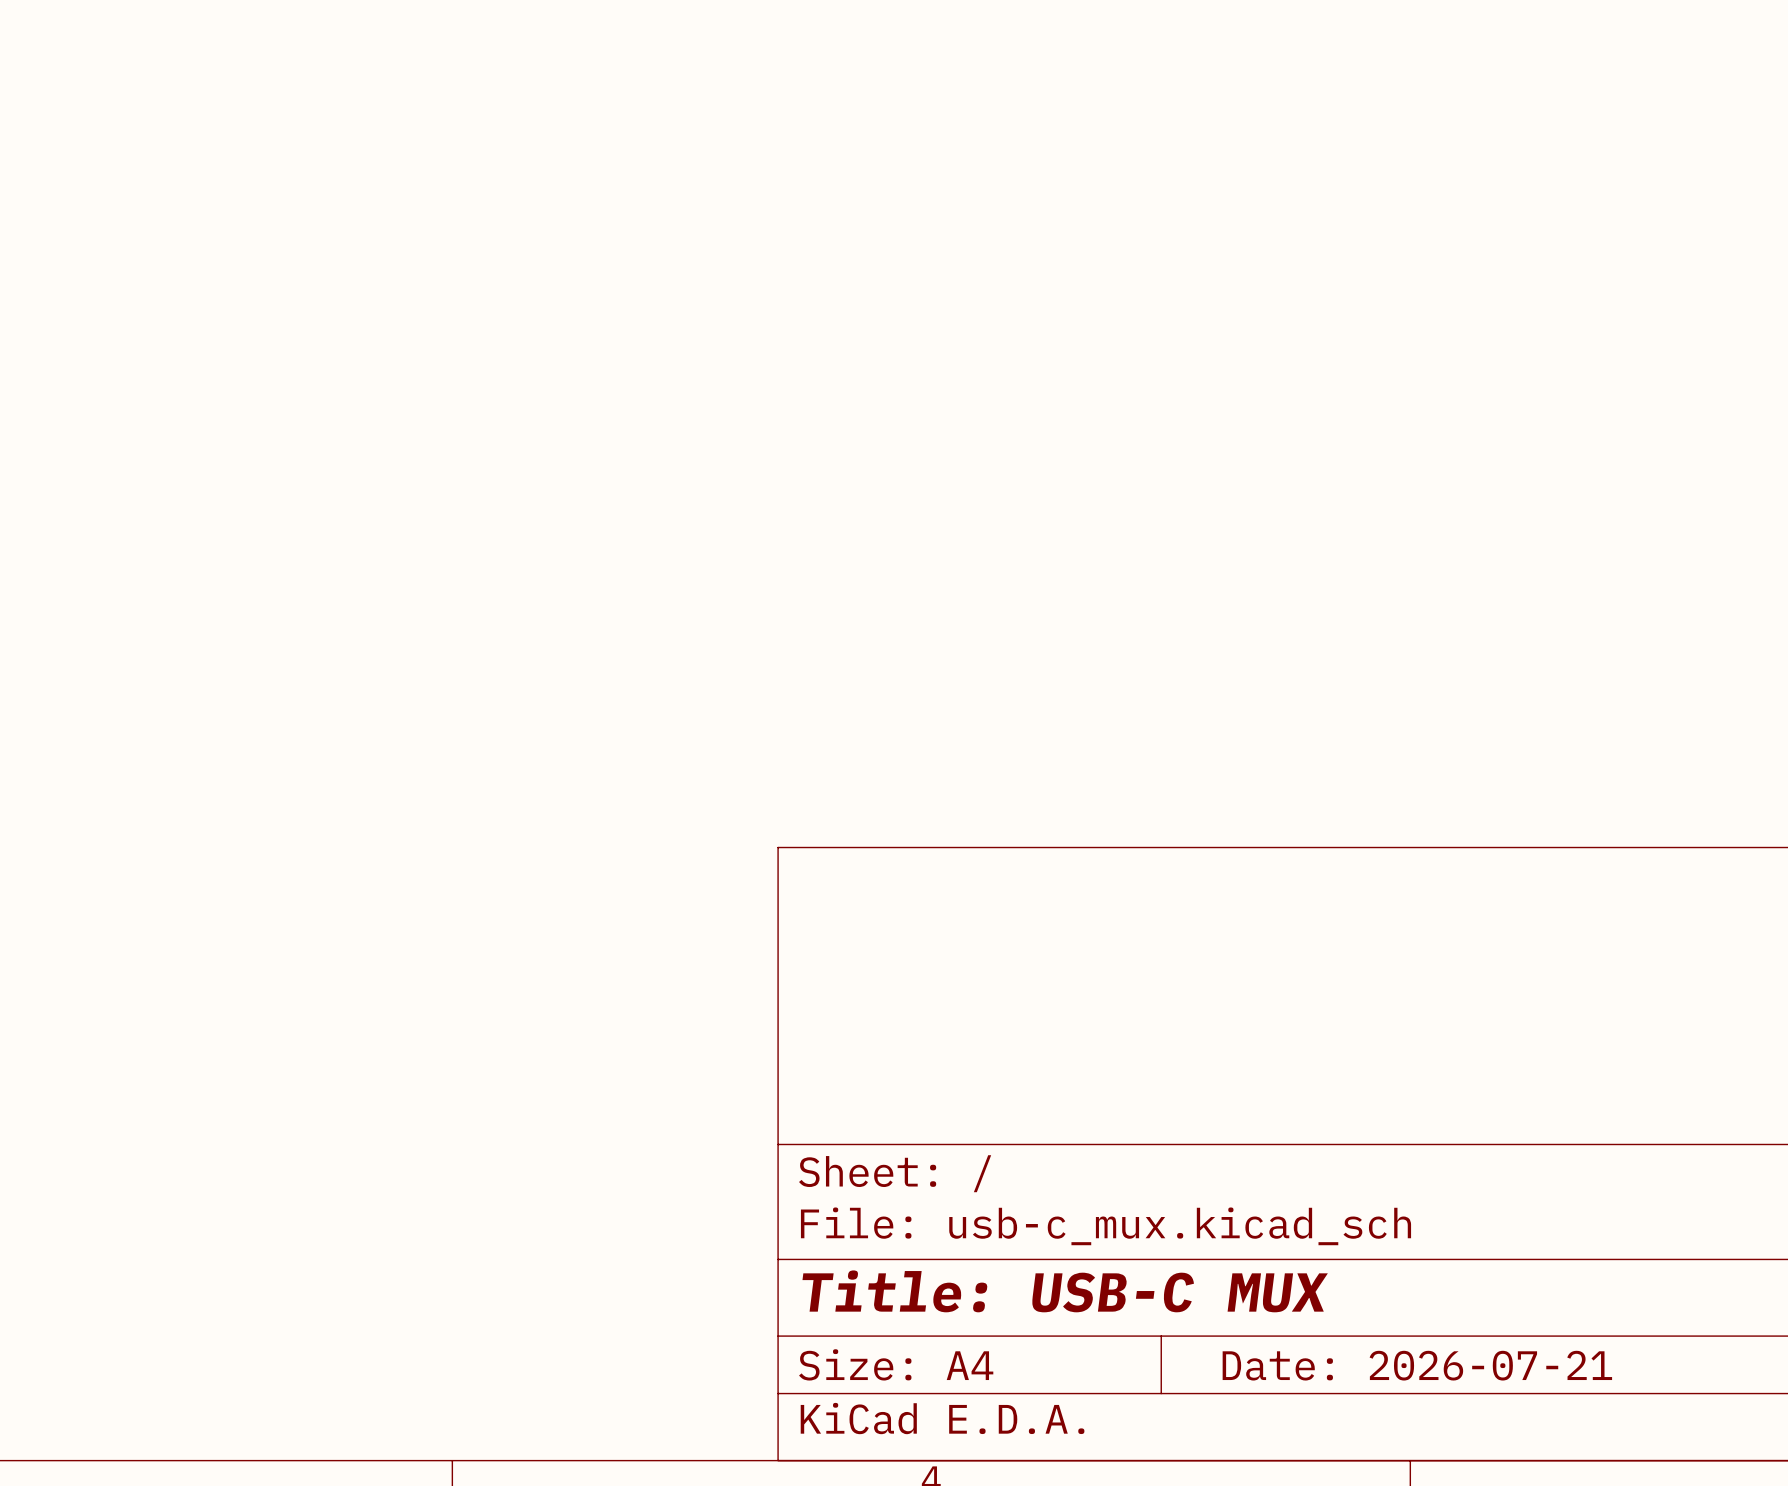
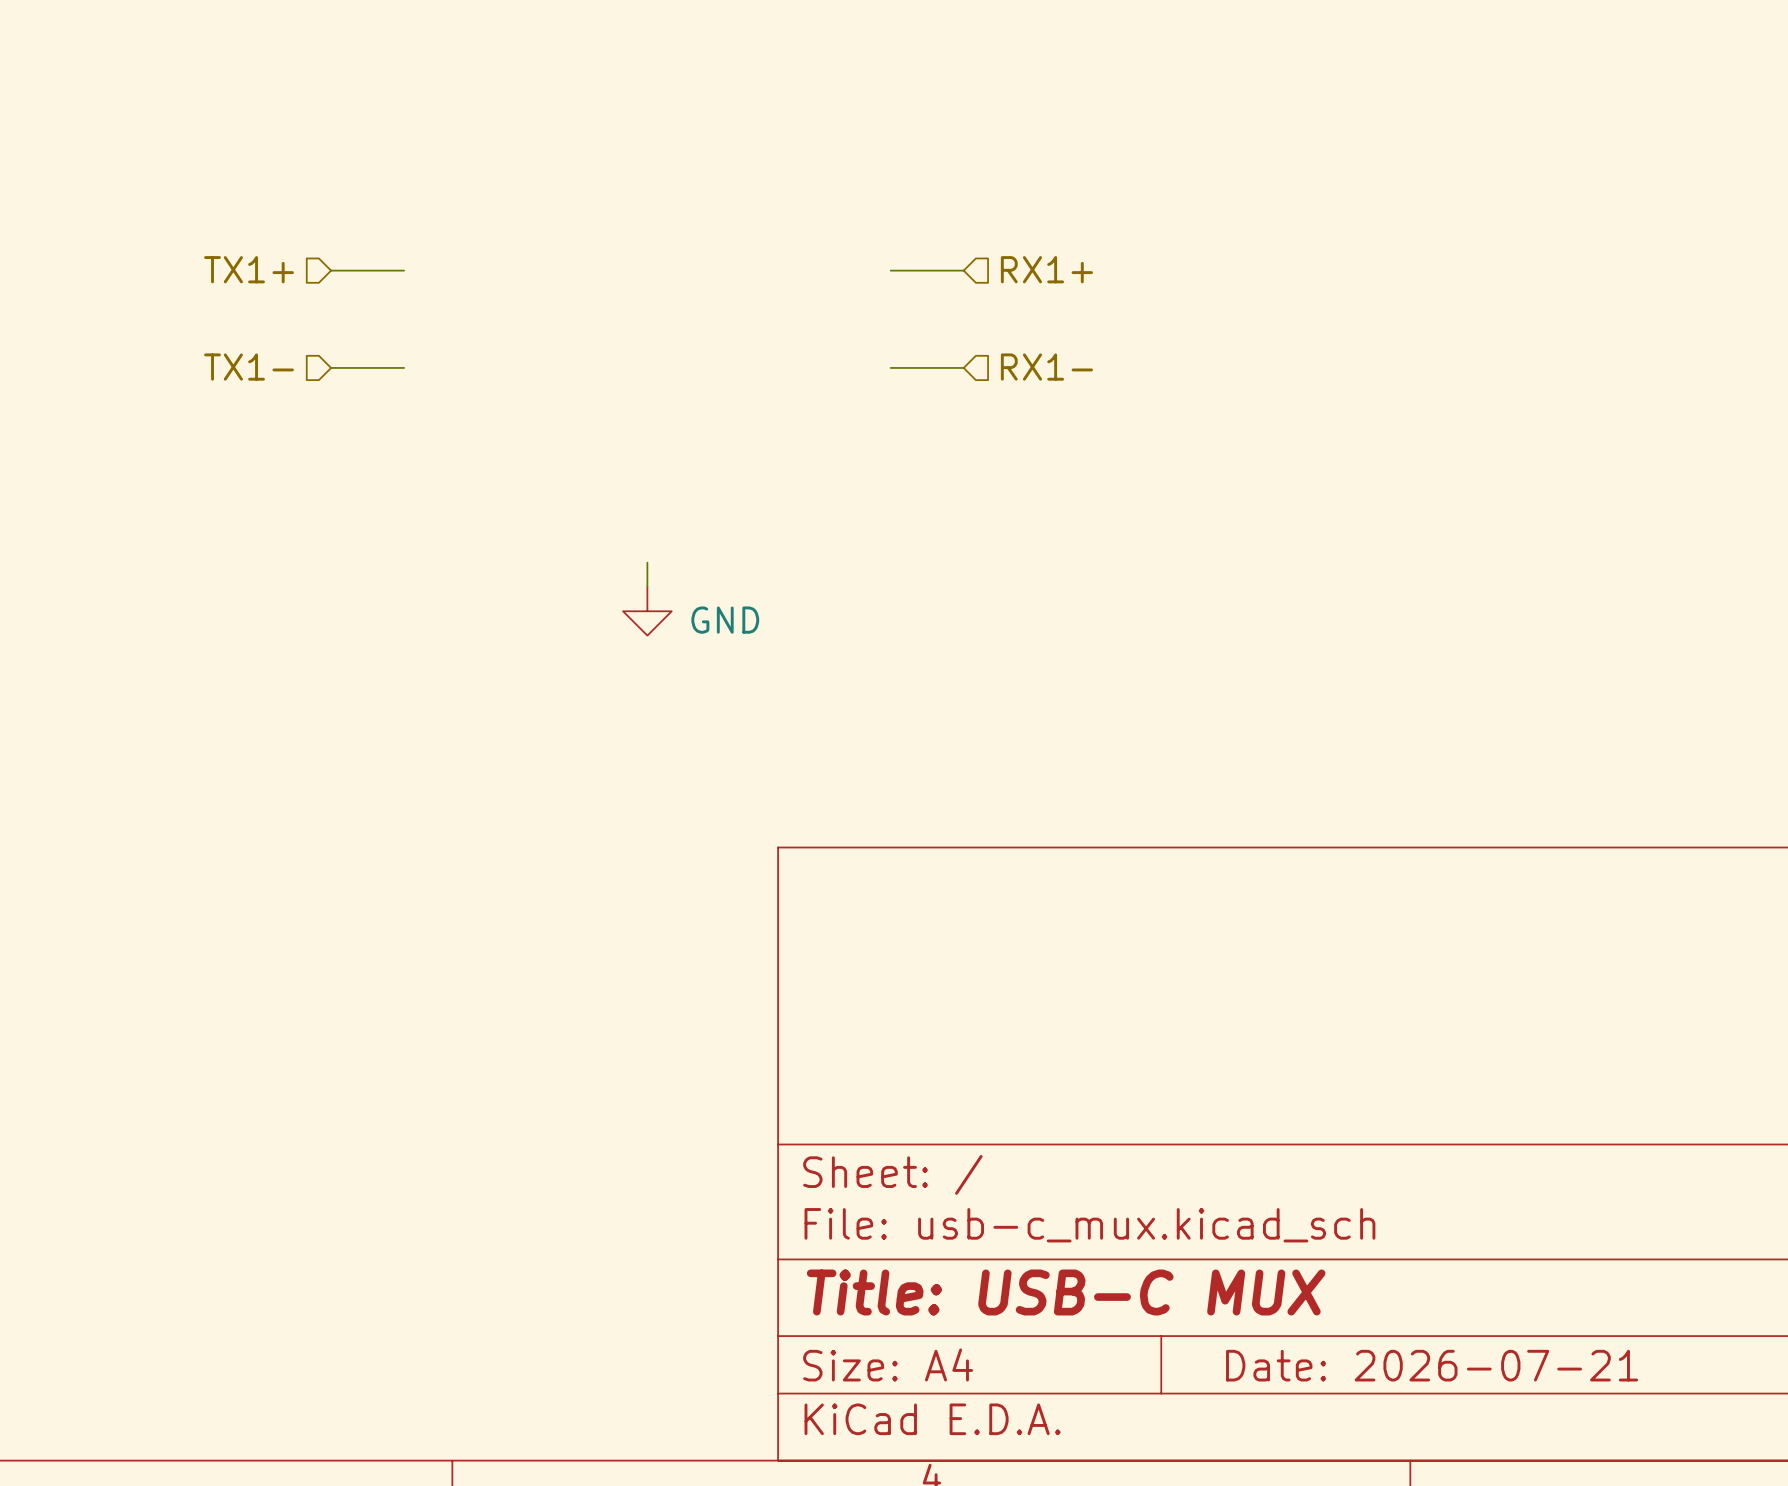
hierarchical label: none -> TX1+ (249, 269)
hierarchical label: none -> RX1+ (1046, 269)
wire: none -> (331, 270) (404, 270)
wire: none -> (890, 270) (963, 270)
hierarchical label: none -> TX1- (249, 367)
wire: none -> (331, 367) (404, 367)
wire: none -> (890, 367) (963, 367)
hierarchical label: none -> RX1- (1046, 367)
wire: none -> (647, 562) (647, 586)
power symbol: none -> GND (647, 611)

